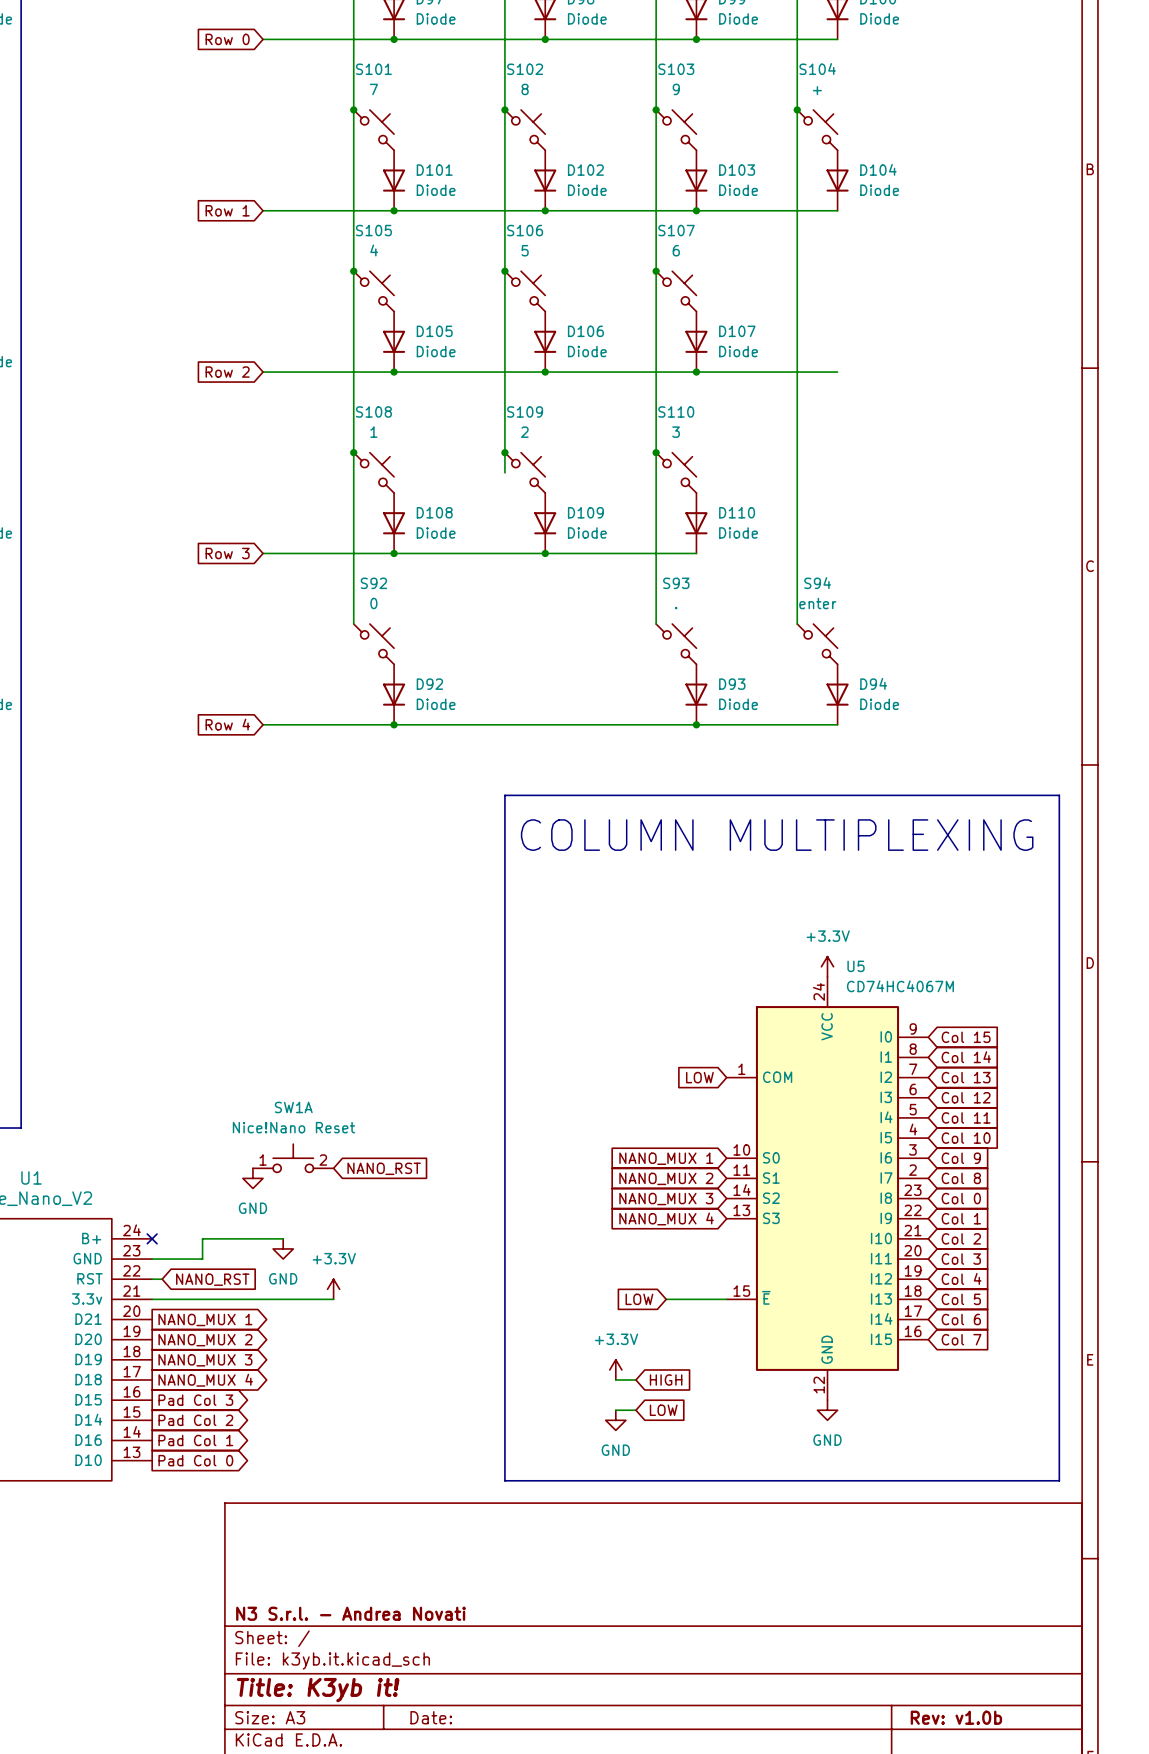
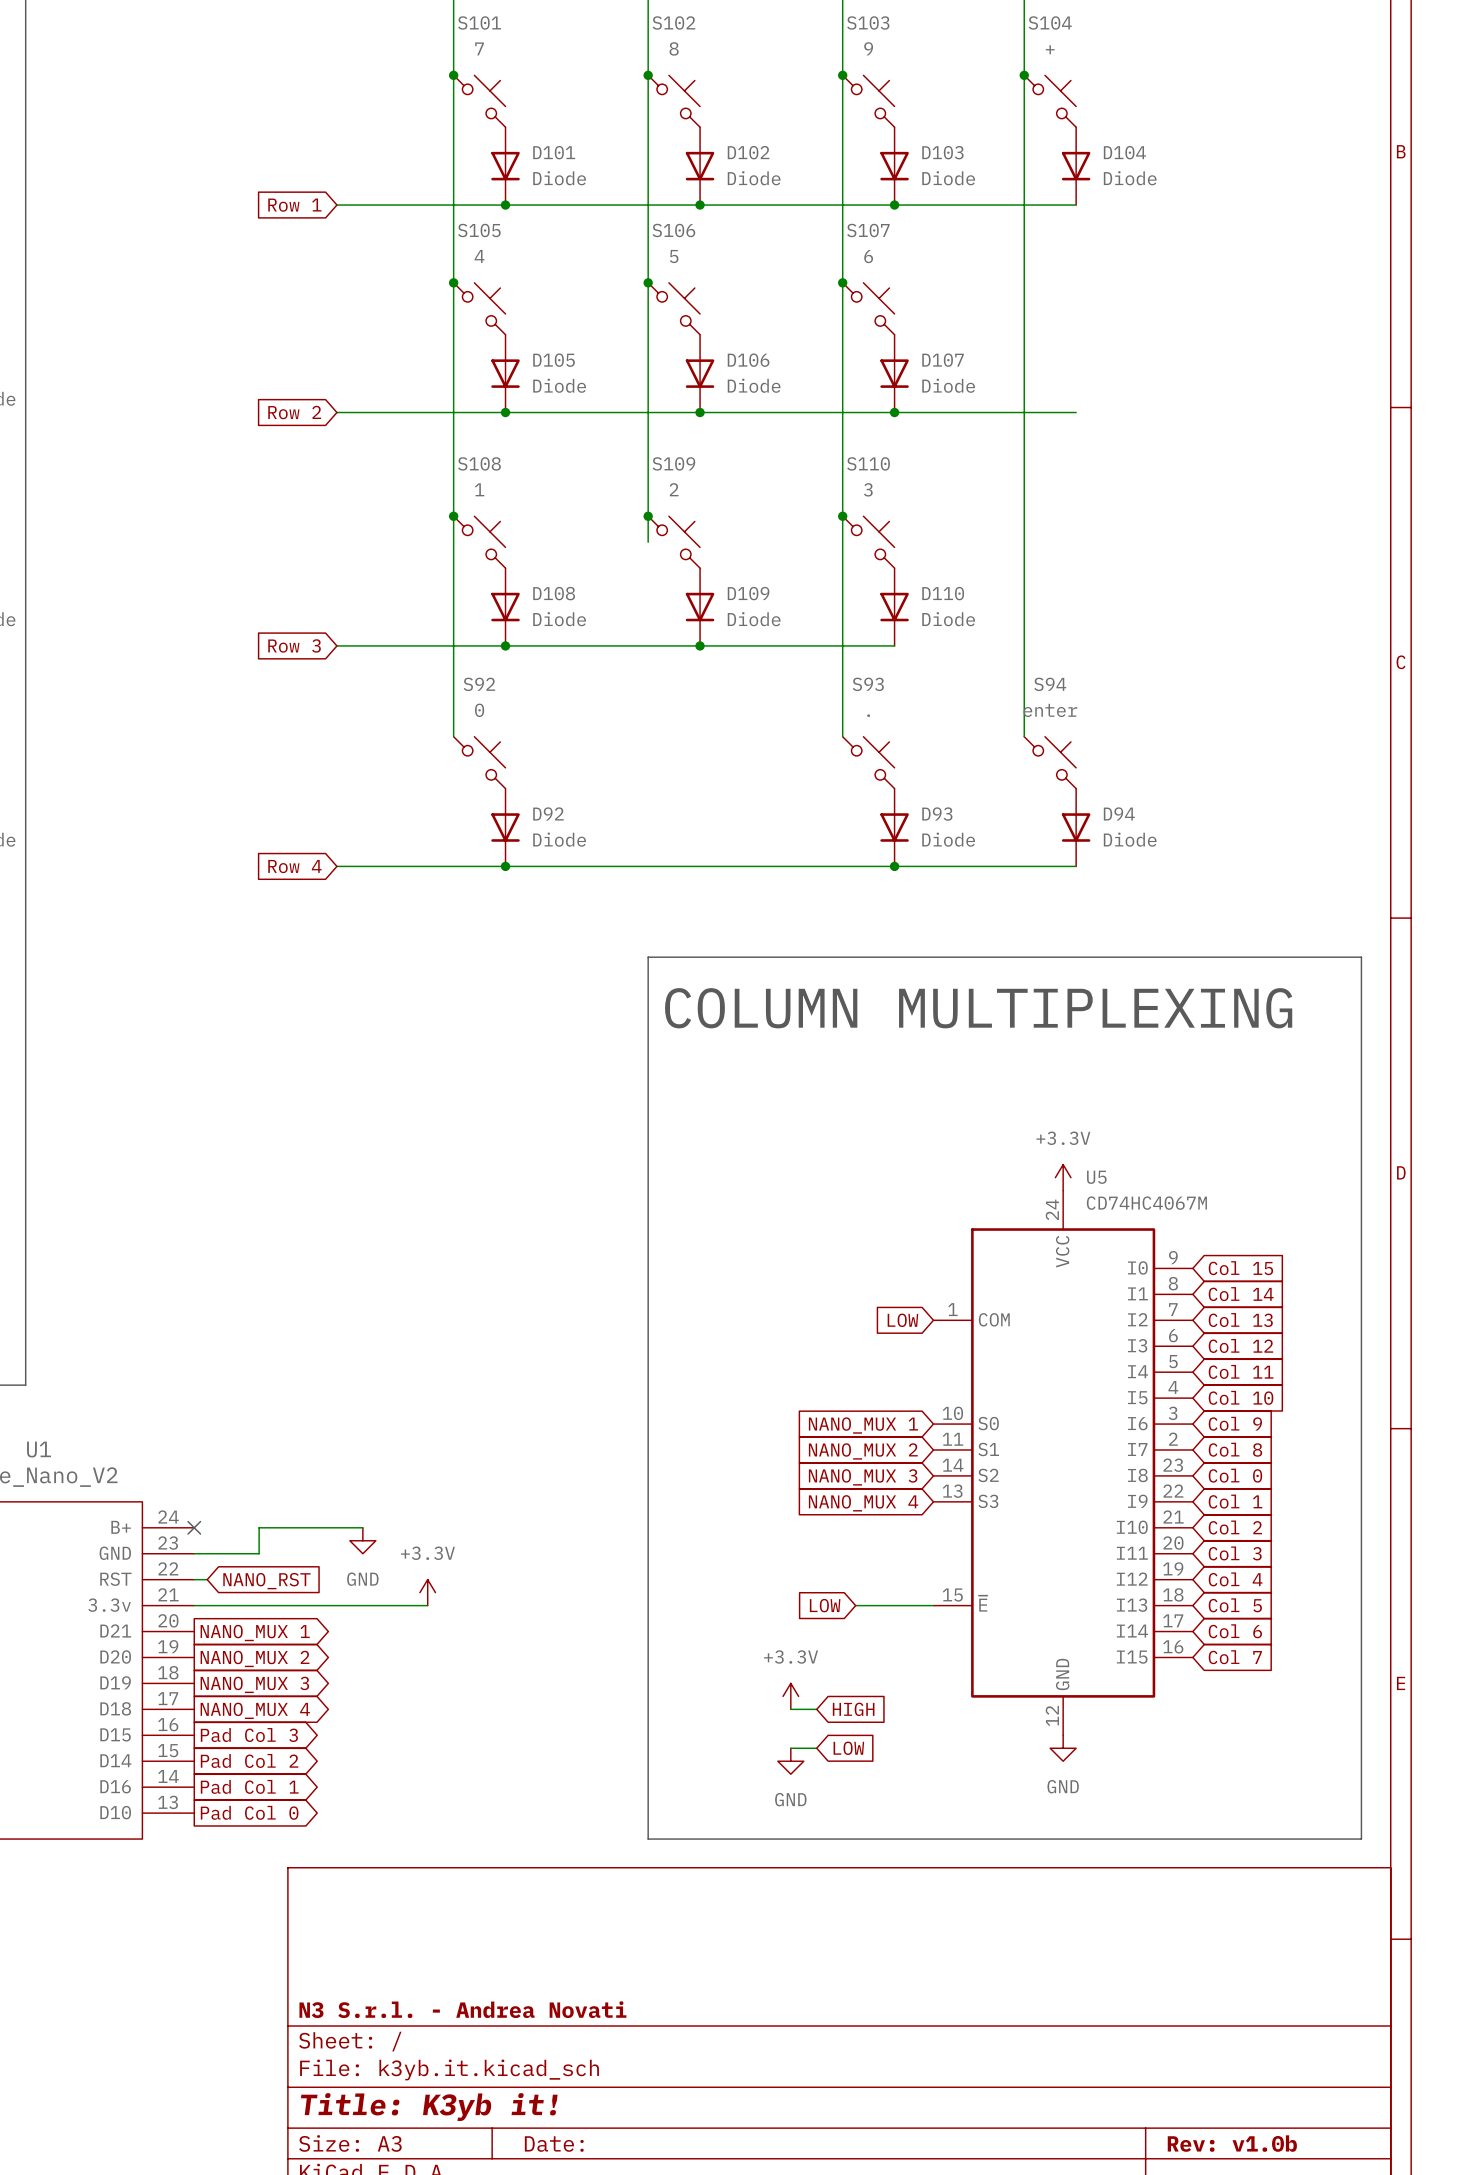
SW1A: Nice!Nano Reset (293, 1158) -> none
global label: NANO_RST (384, 1168) -> none
power symbol: GND (252, 1178) -> none

